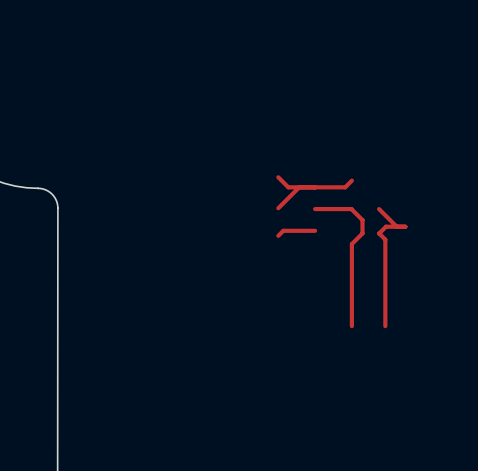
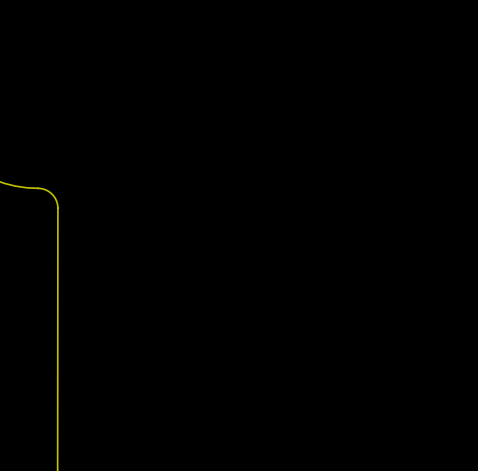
top track: (278, 177) (288, 187) (345, 187) (351, 180) -> none
top track: (299, 187) (278, 208) -> none
top track: (315, 209) (351, 209) (362, 220) (362, 233) (351, 244) (351, 326) -> none
top track: (379, 209) (396, 226) -> none
top track: (405, 226) (386, 226) (379, 233) (385, 239) (385, 326) -> none
top track: (315, 230) (283, 230) (278, 235) -> none

